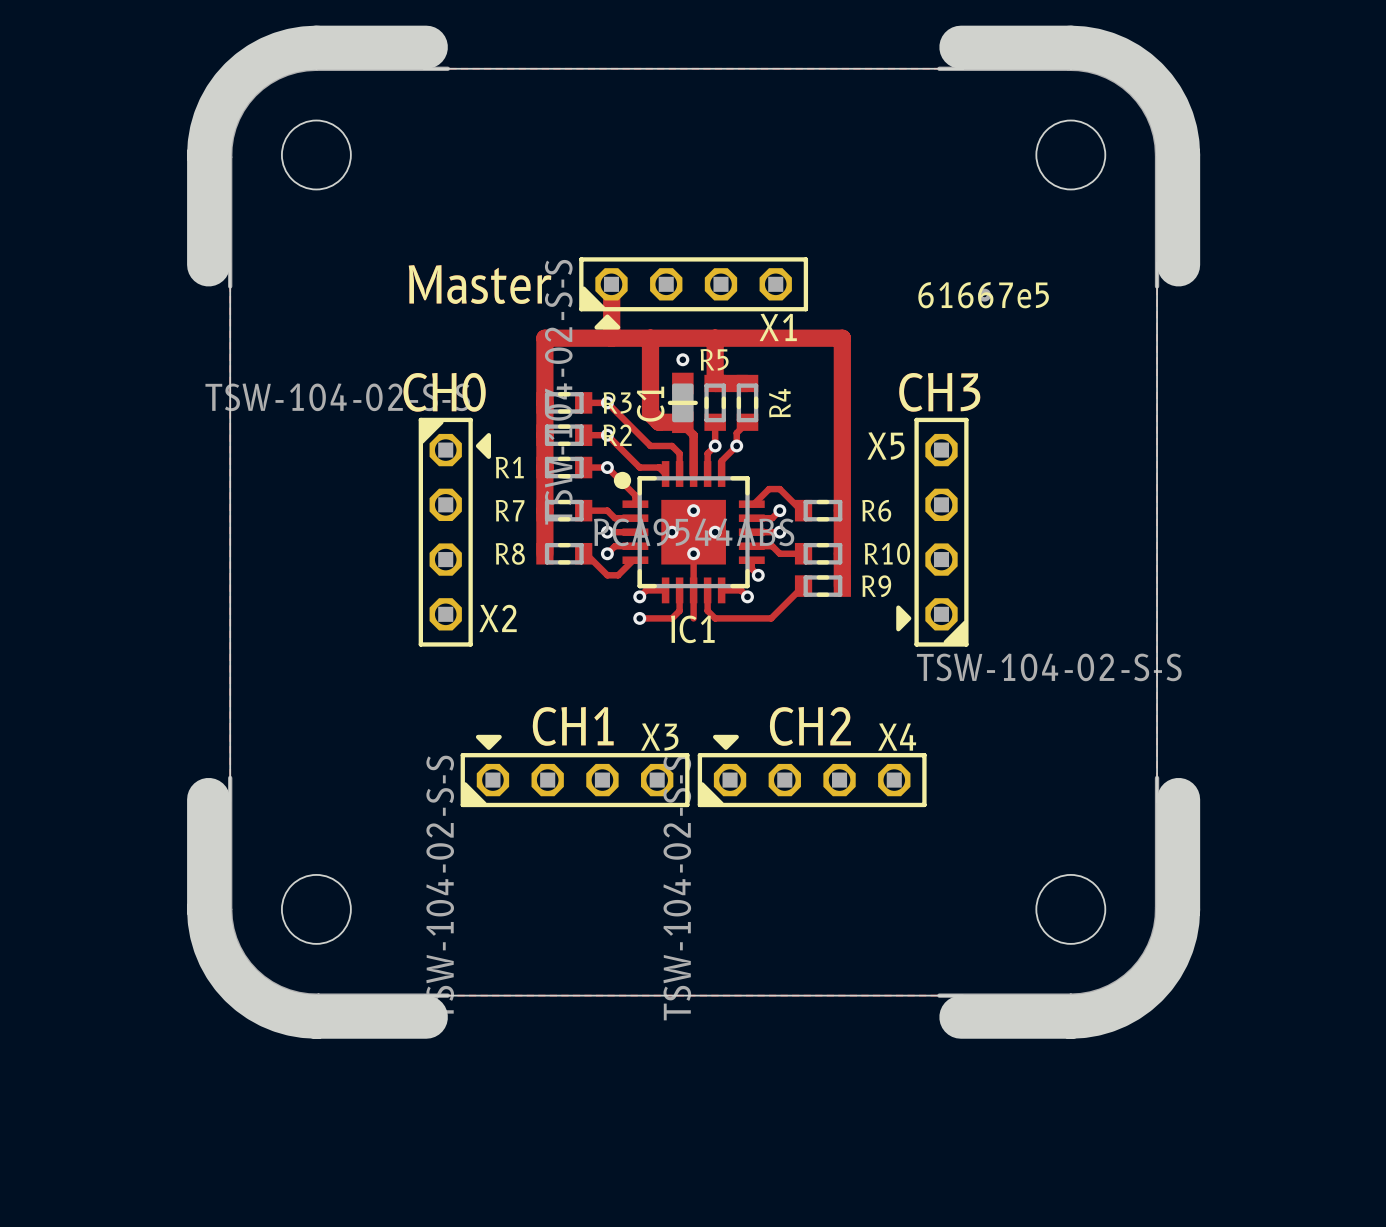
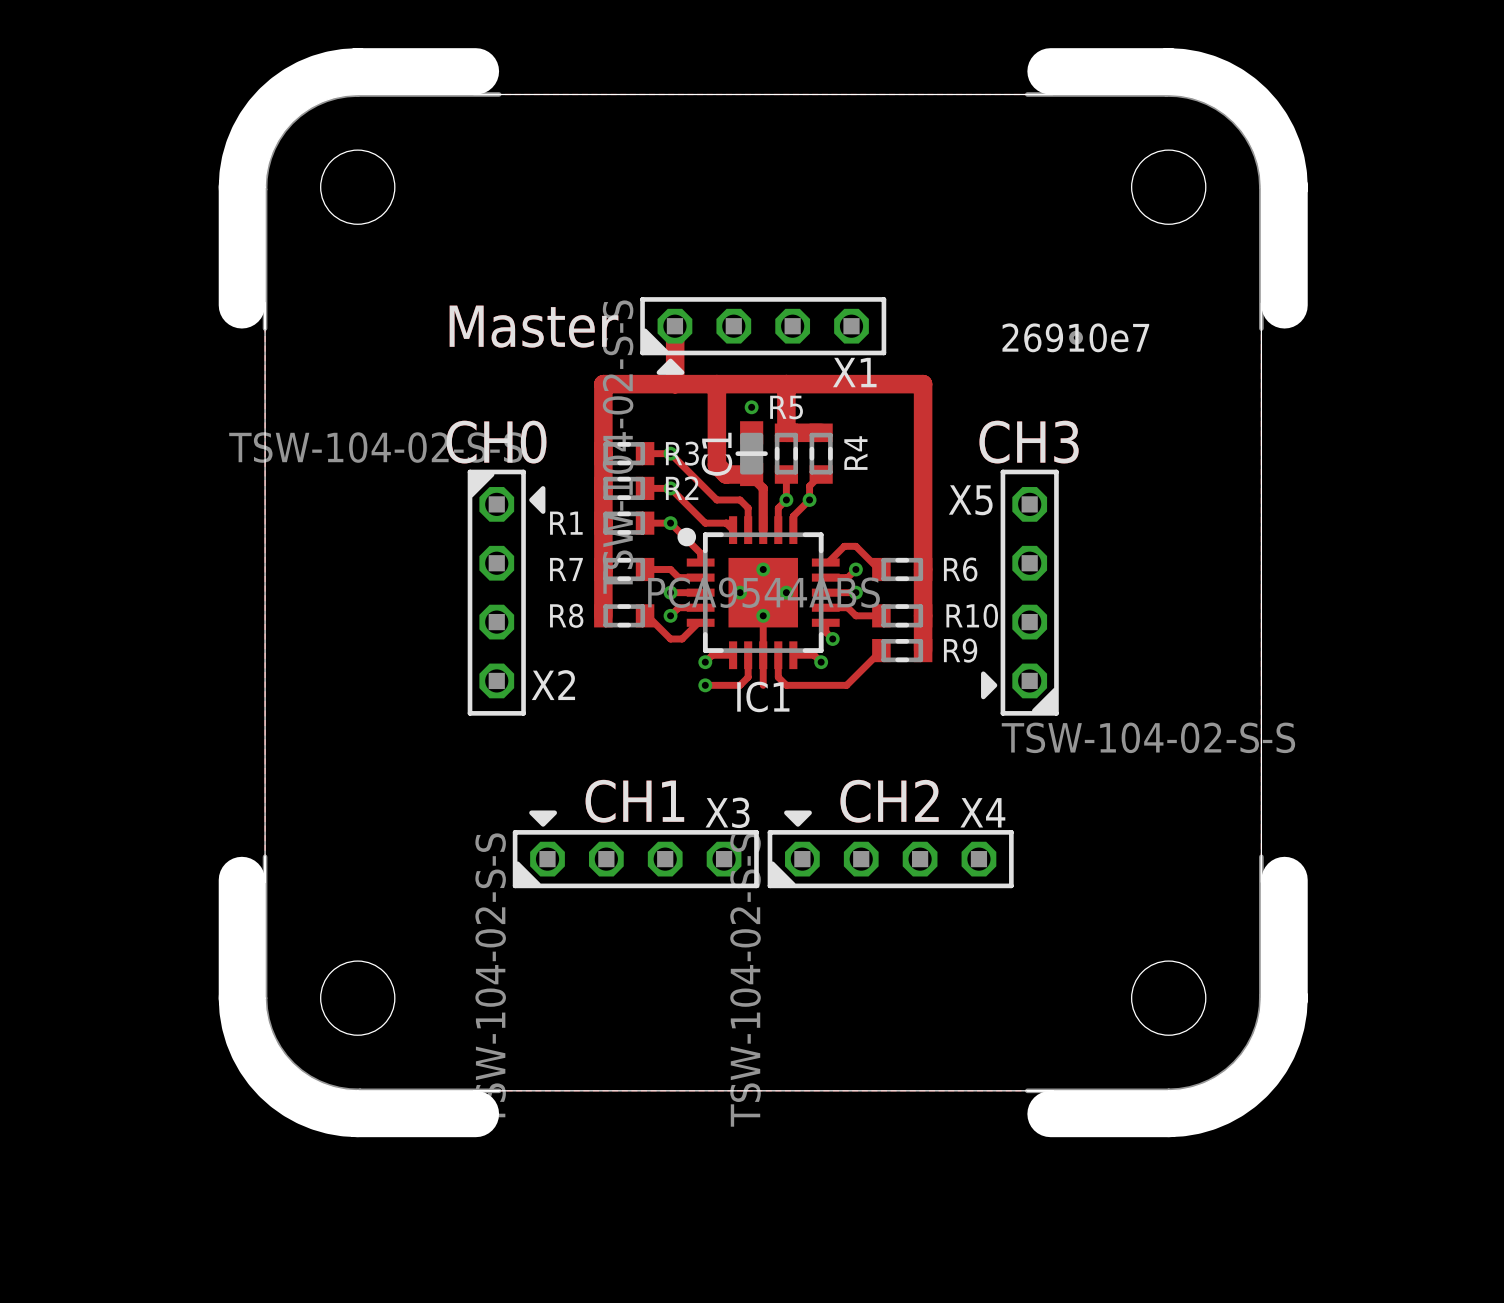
drawing shape: [918, 282, 1049, 309] -> [1002, 323, 1150, 353]

